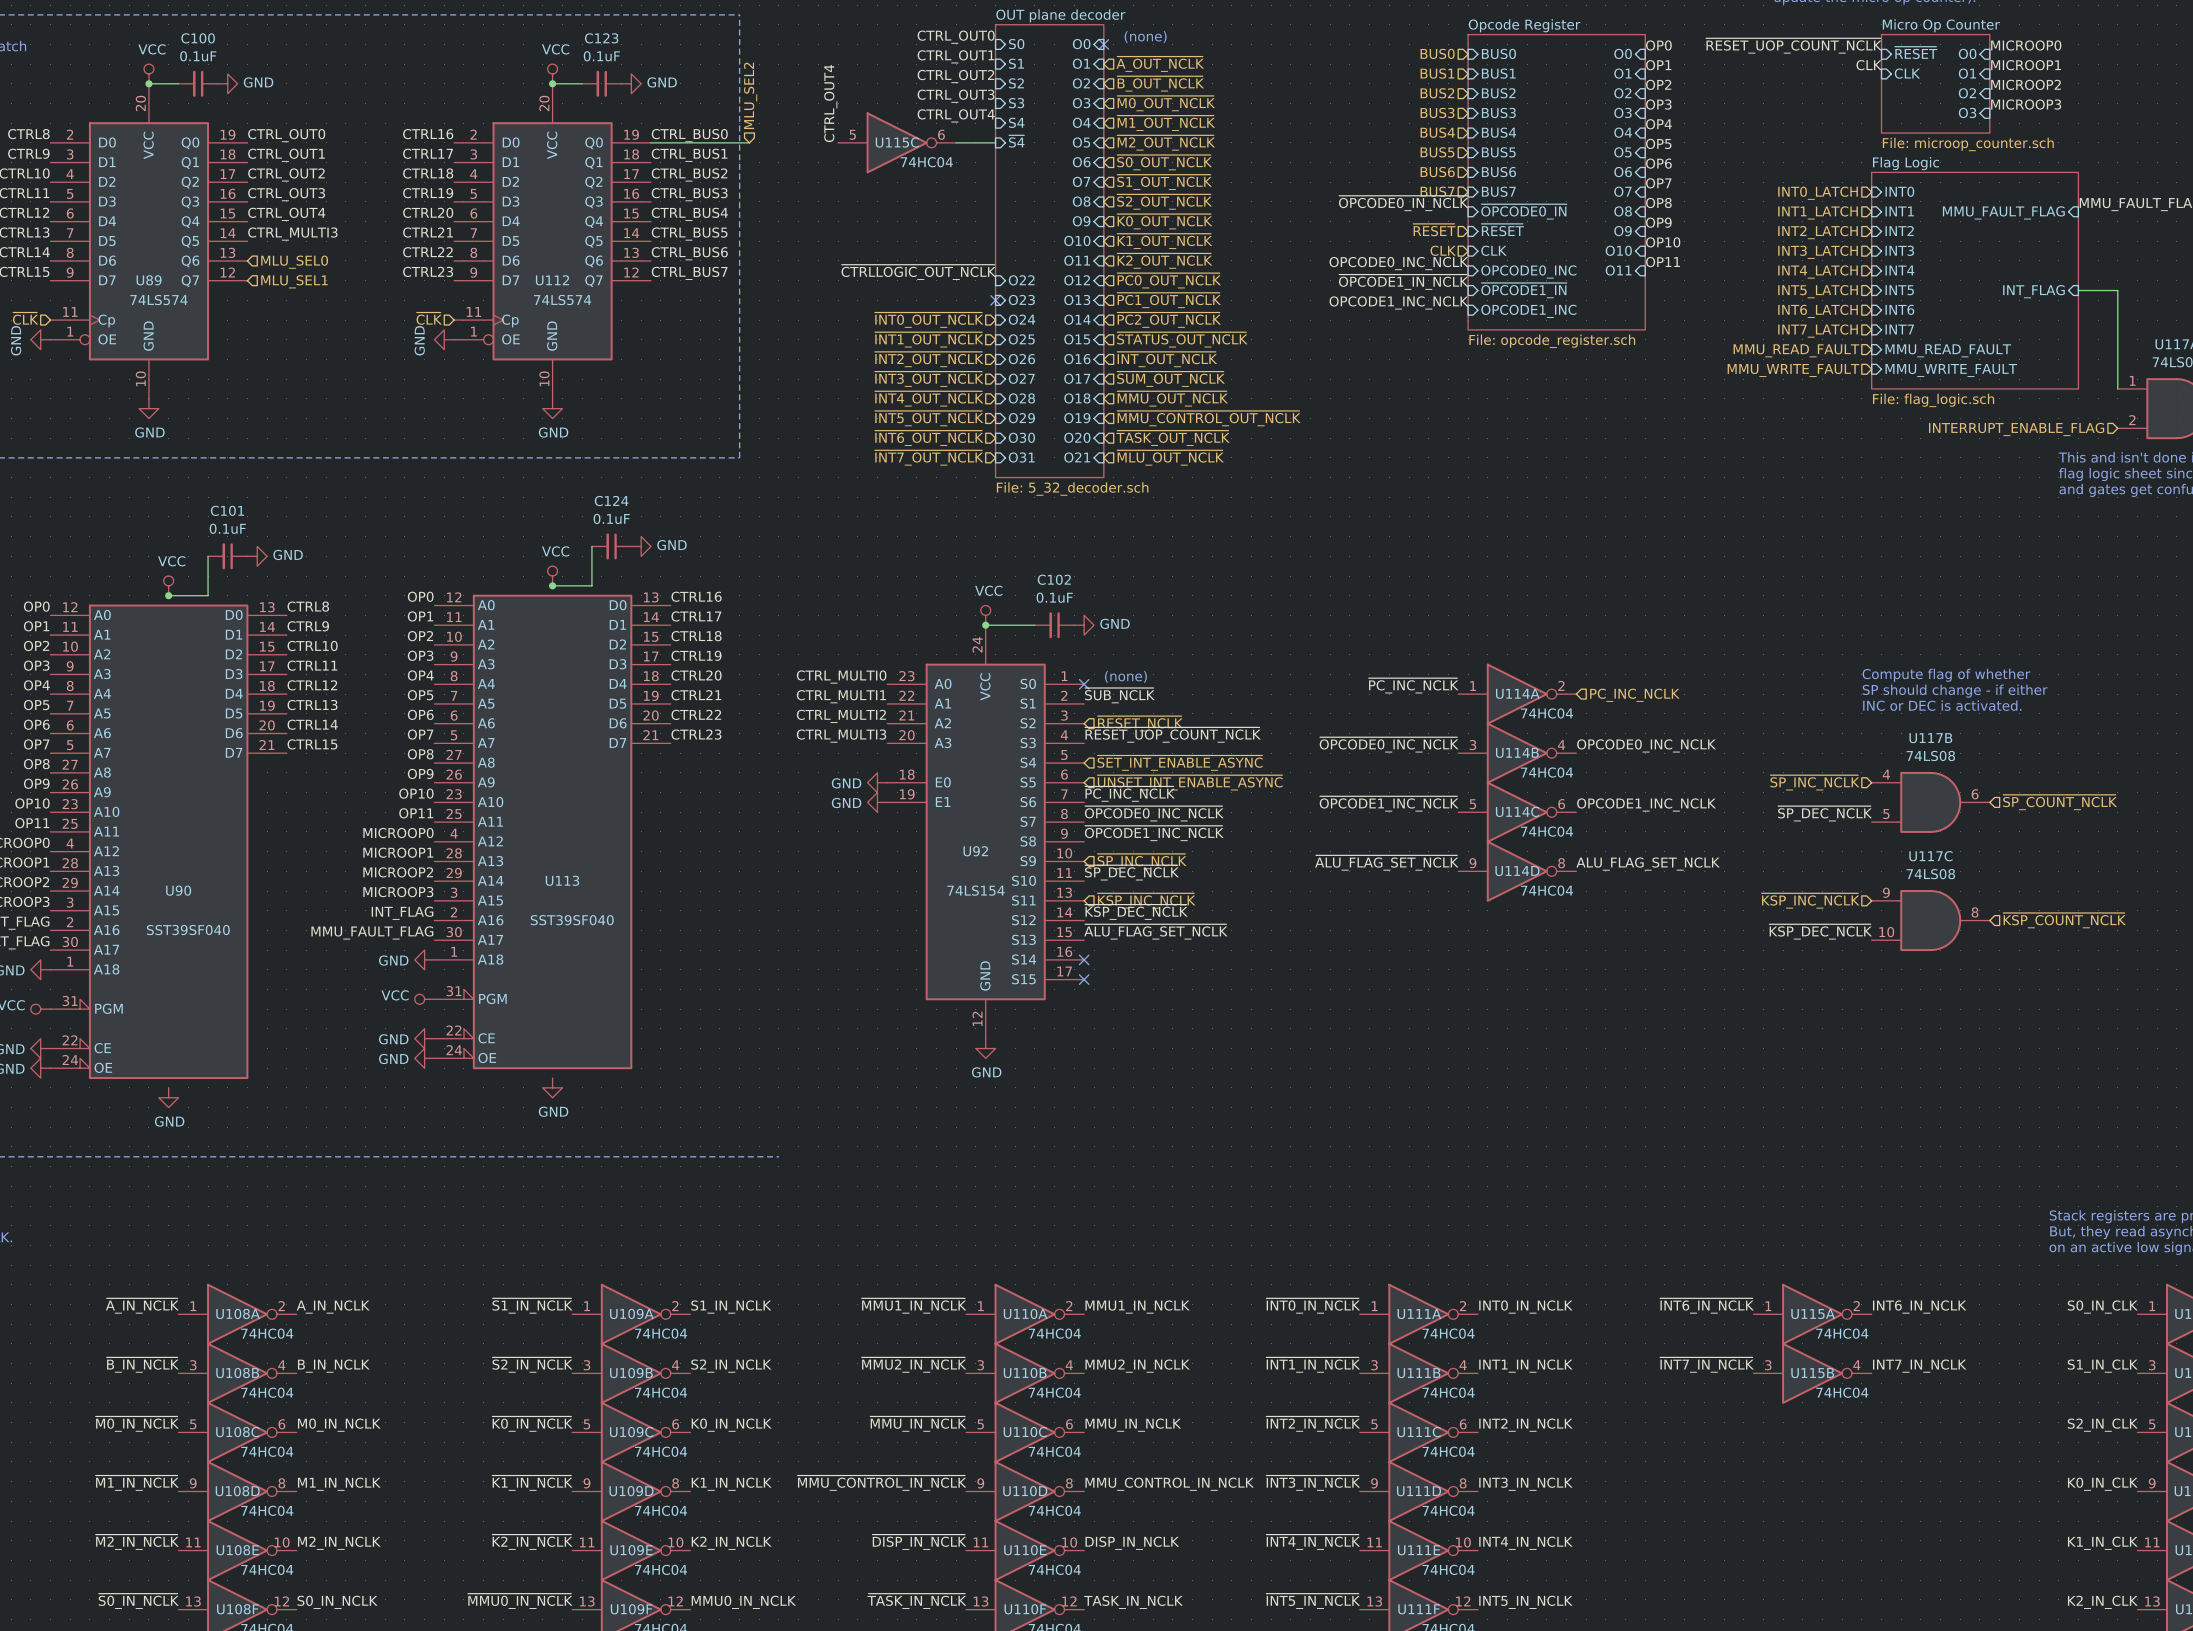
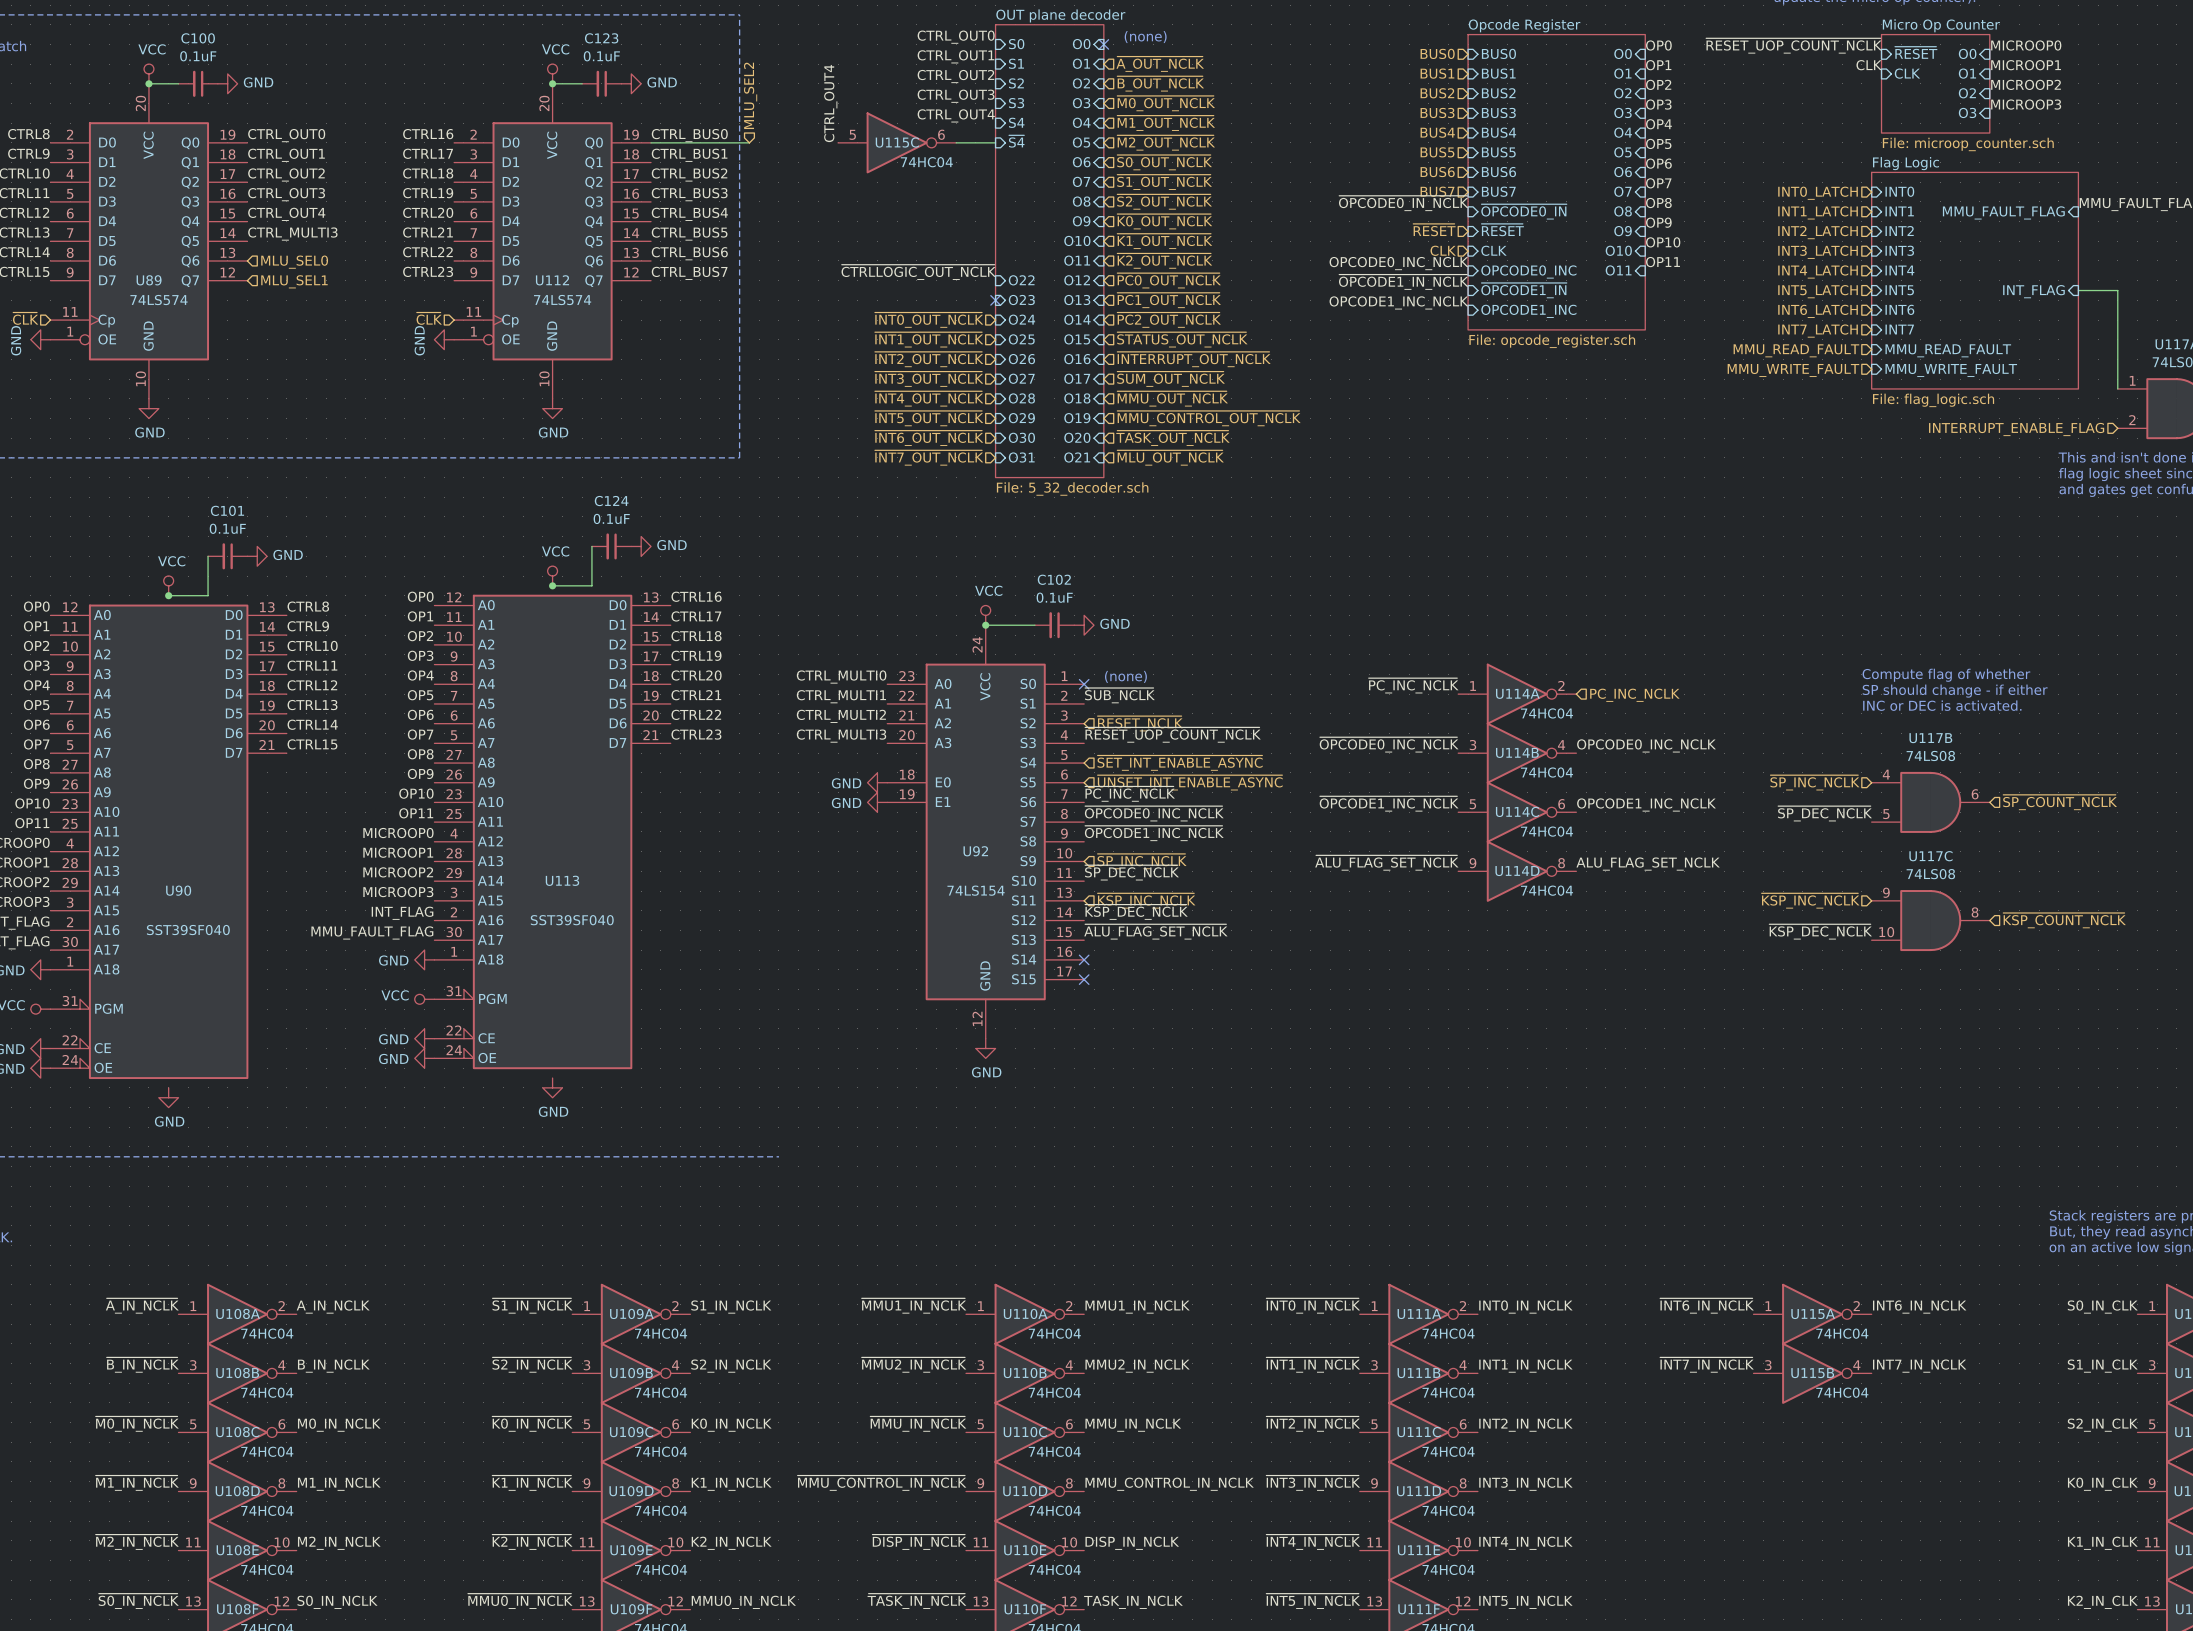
hierarchical label: ~{INT_OUT_NCLK} (1167, 359) -> ~{INTERRUPT_OUT_NCLK} (1194, 359)

